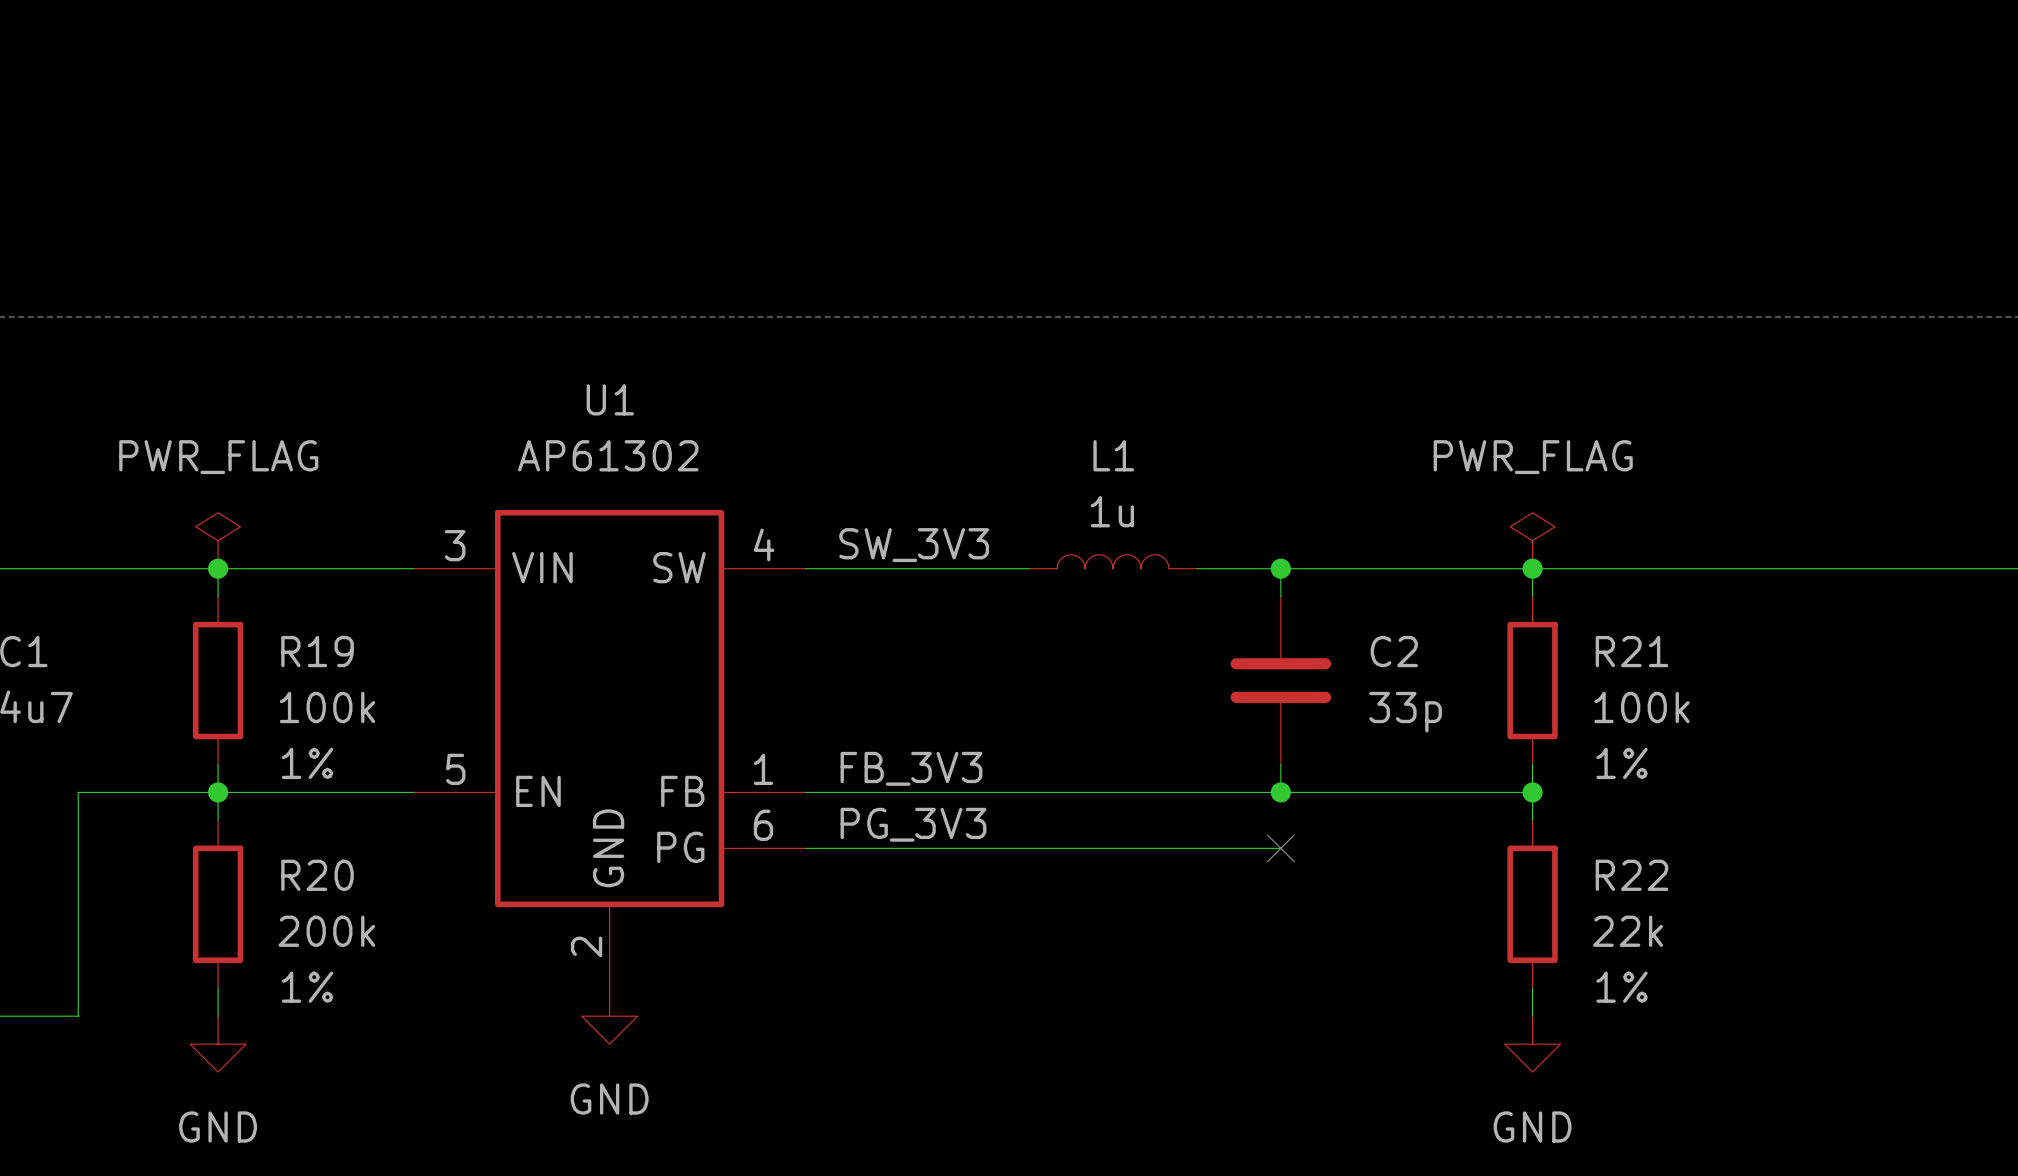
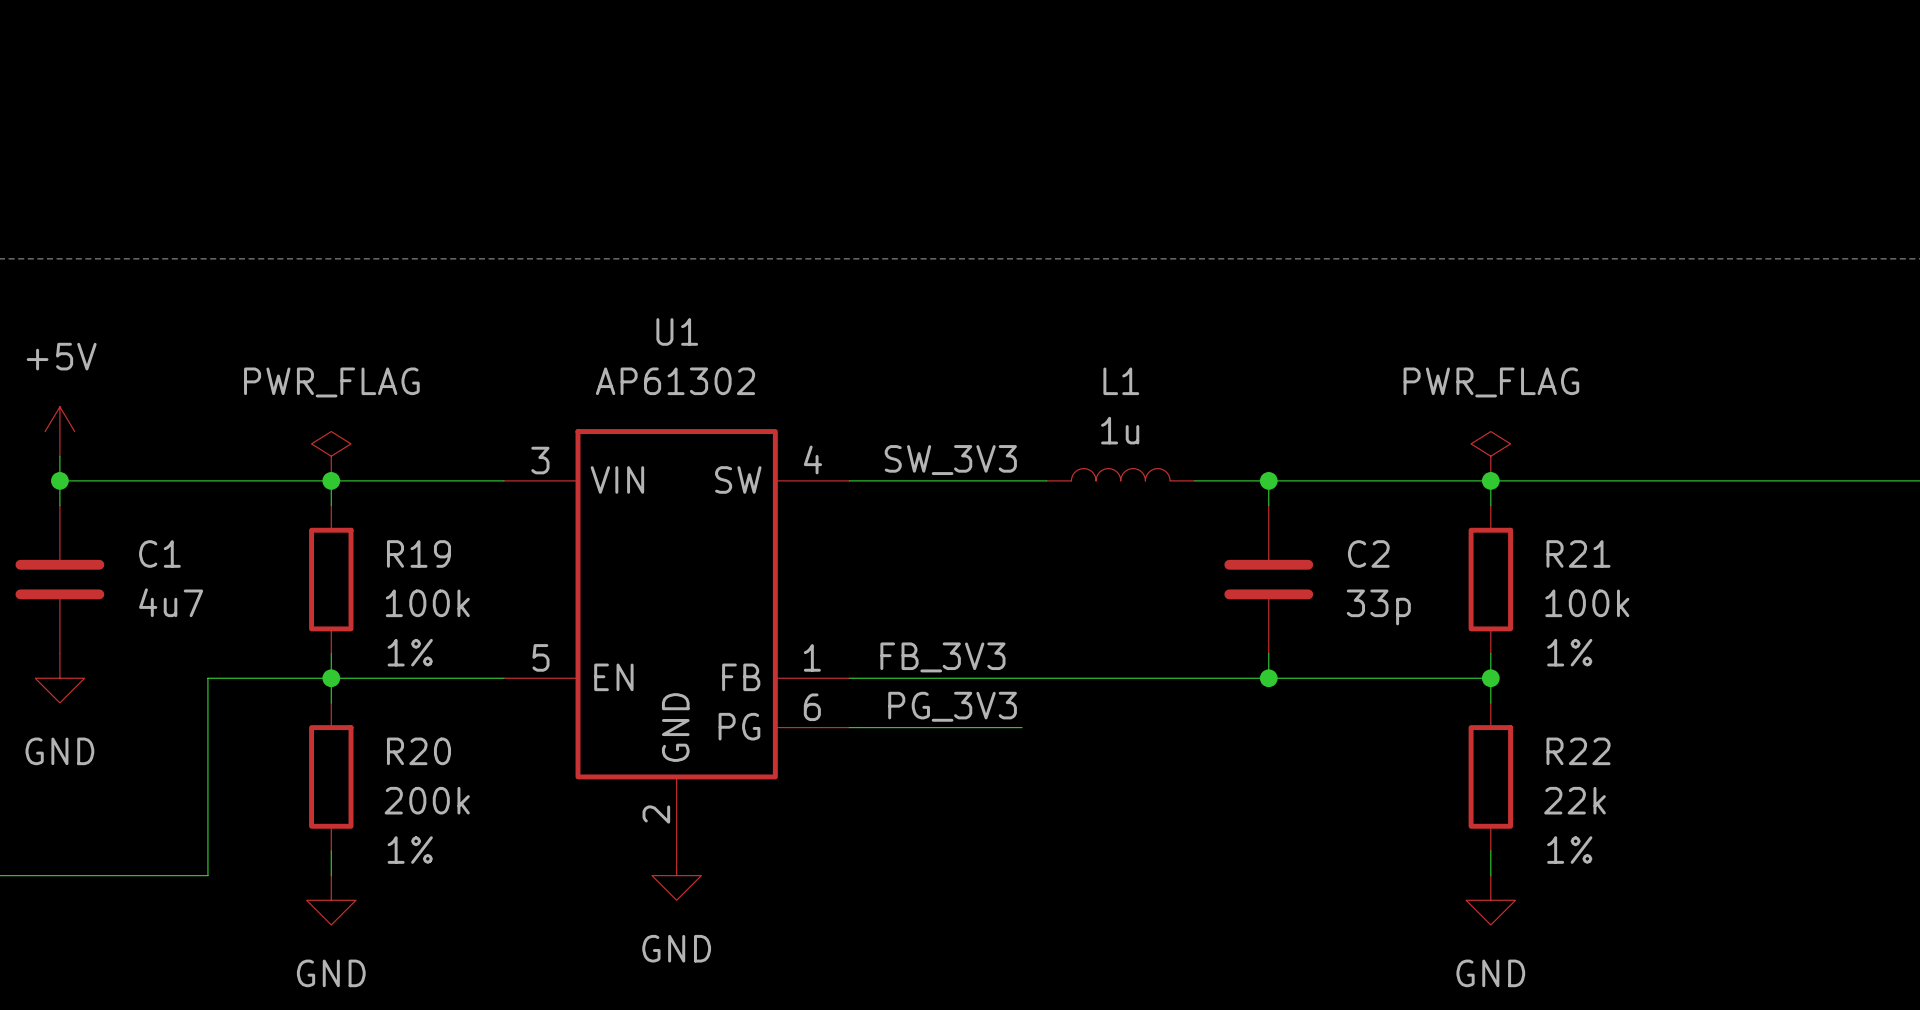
label position: SW_3V3 (914, 545) -> SW_3V3 (950, 460)
label position: PG_3V3 (913, 824) -> PG_3V3 (952, 706)
wire: (1001, 848) (1280, 848) -> none
no-connect mark: (1280, 848) -> none

